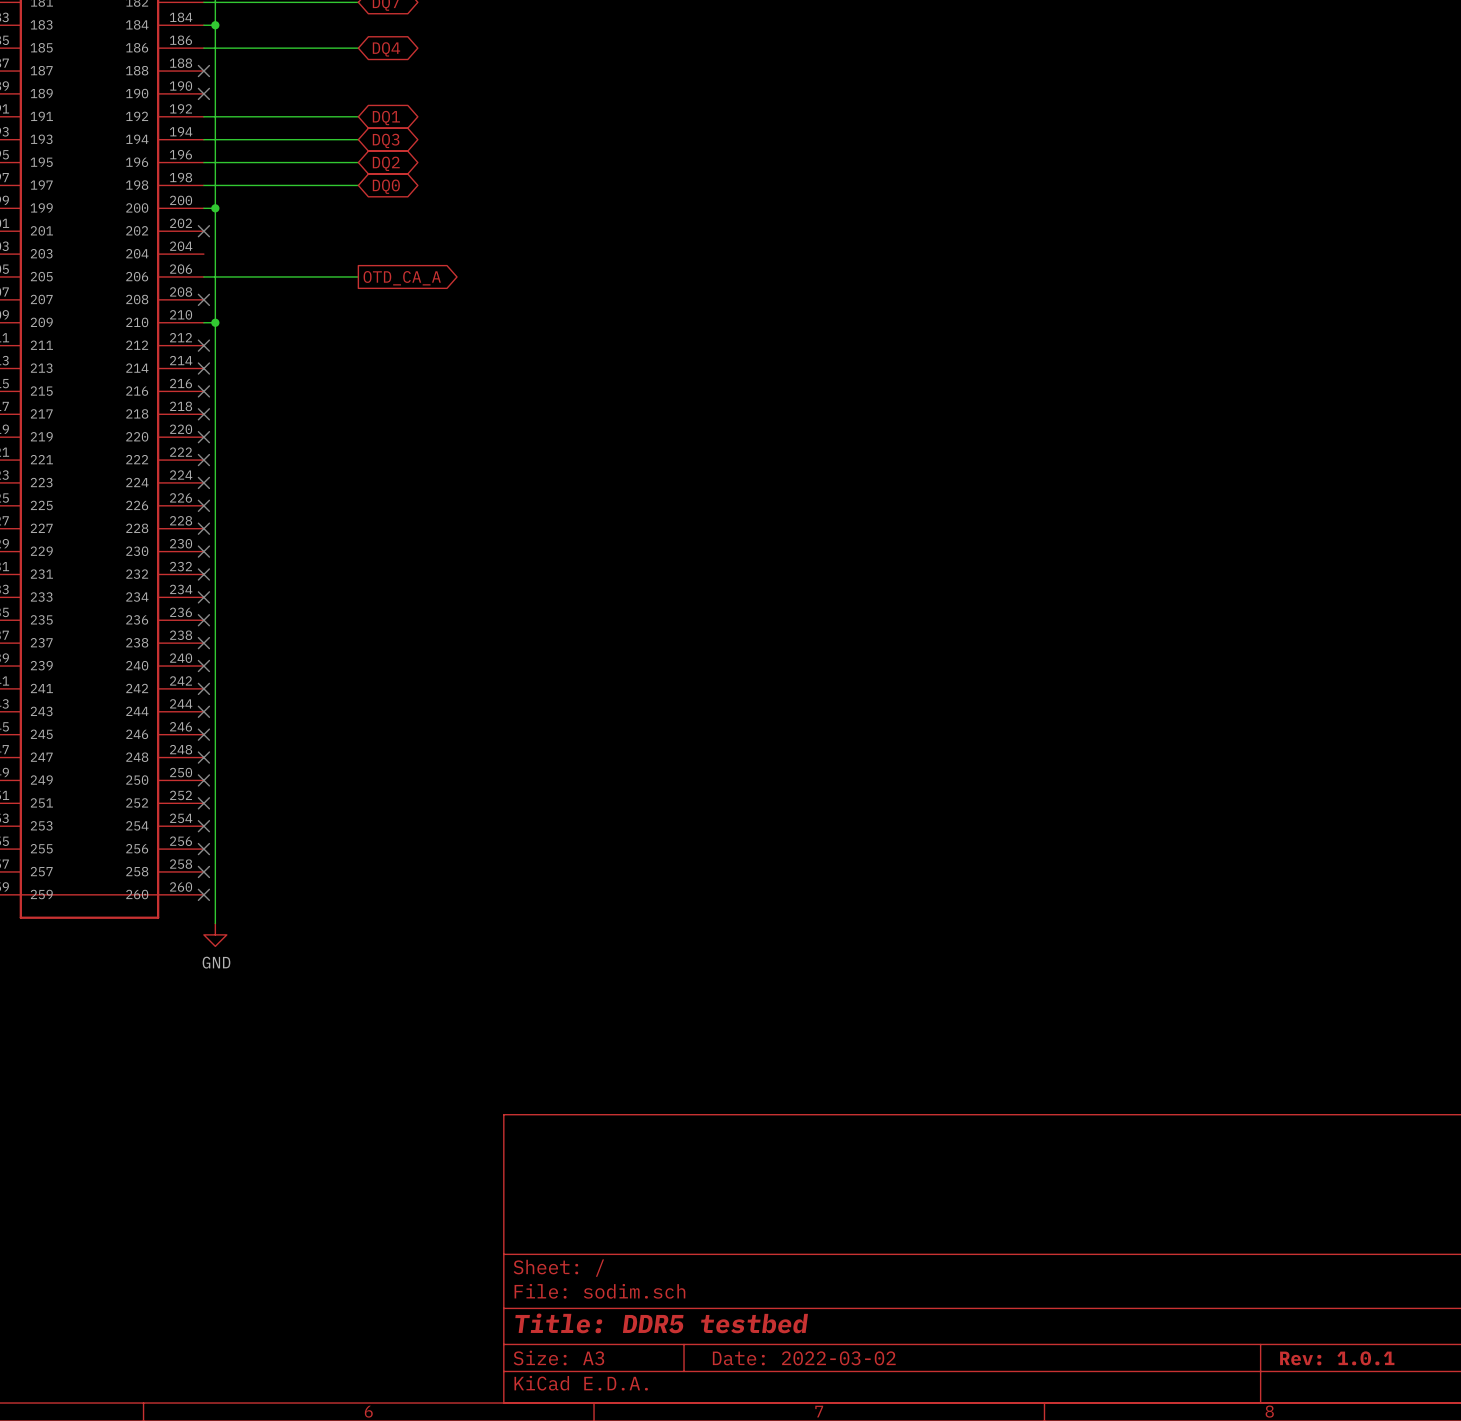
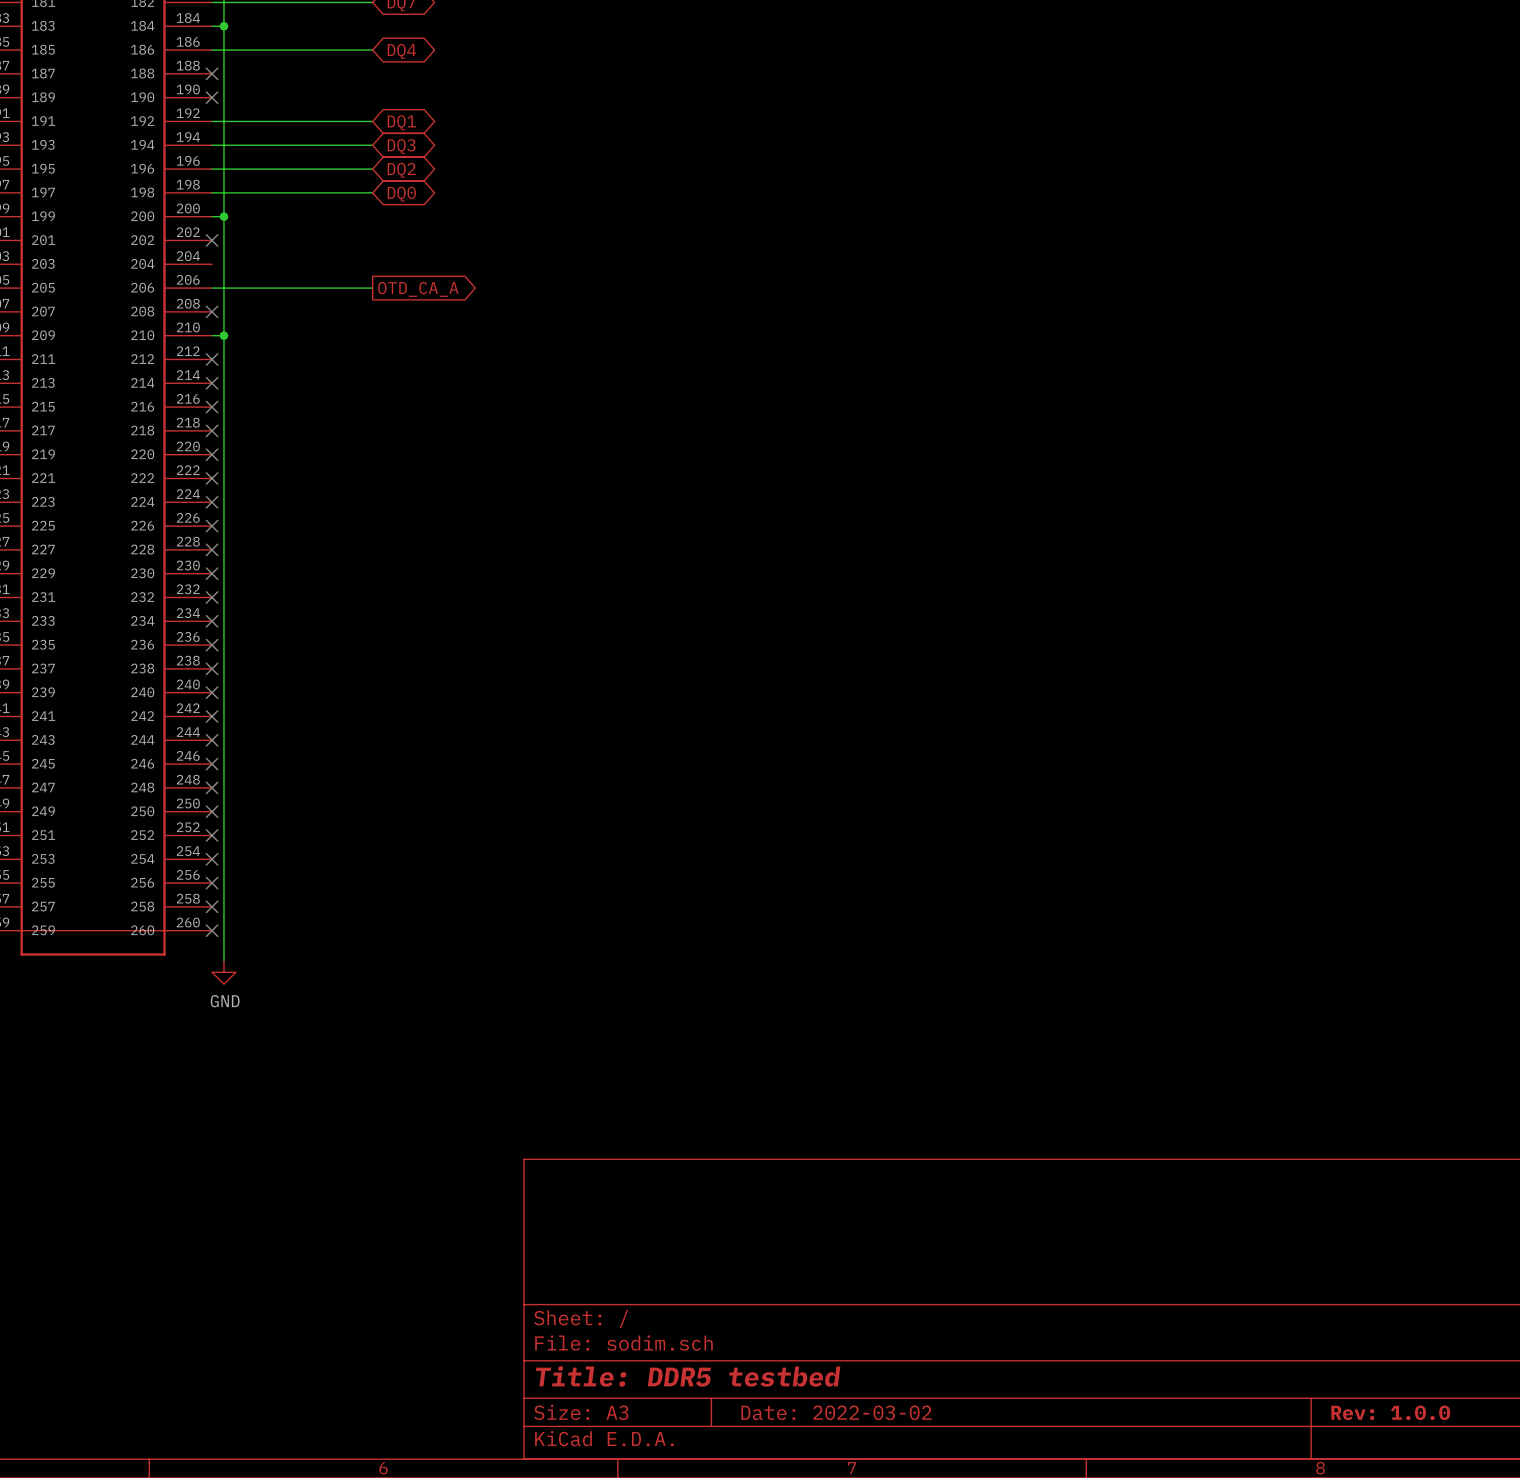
title block: Rev: 1.0.1 (1337, 1358) -> Rev: 1.0.0 (1390, 1412)

